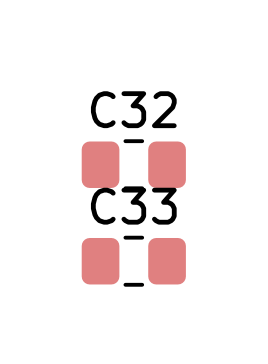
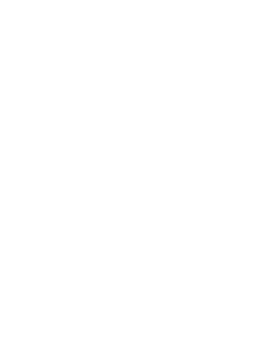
C32: (133, 164) -> none
C33: (133, 261) -> none

